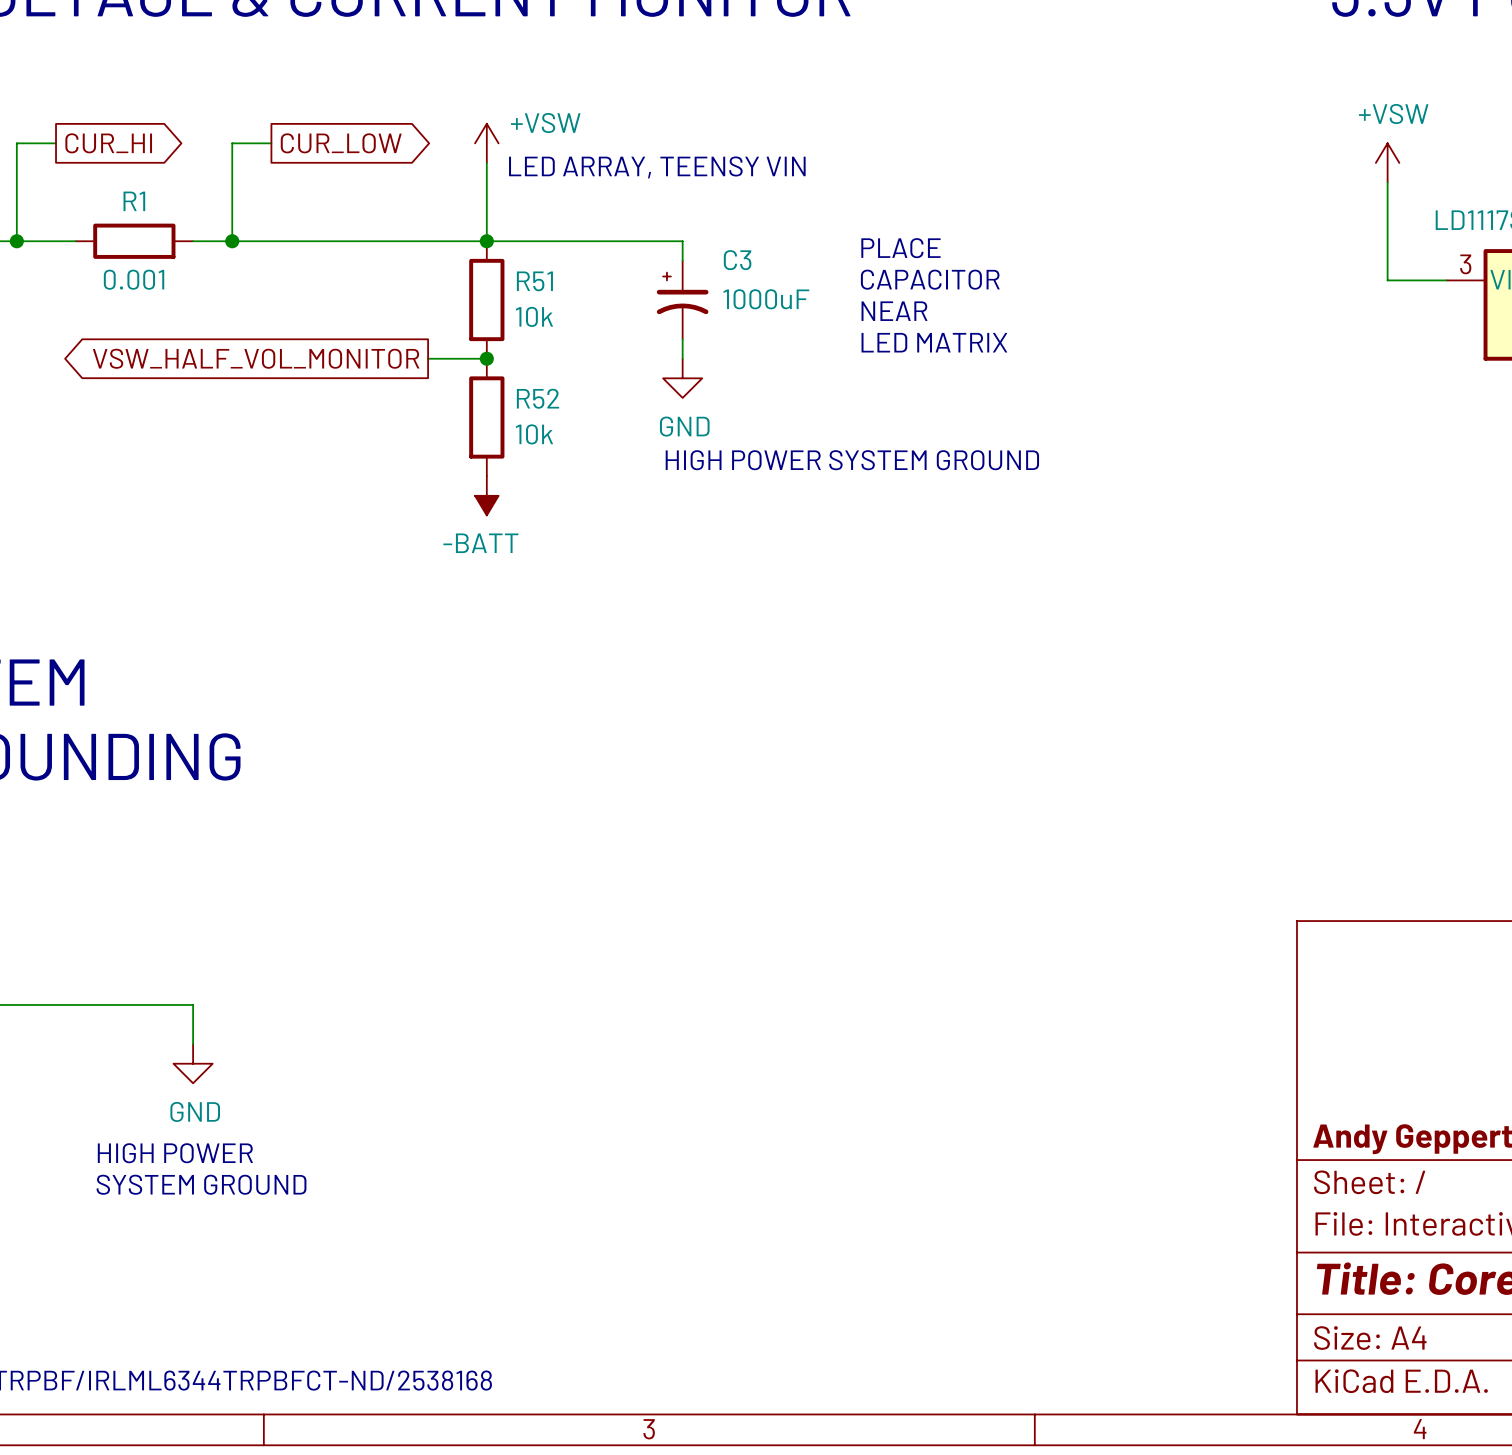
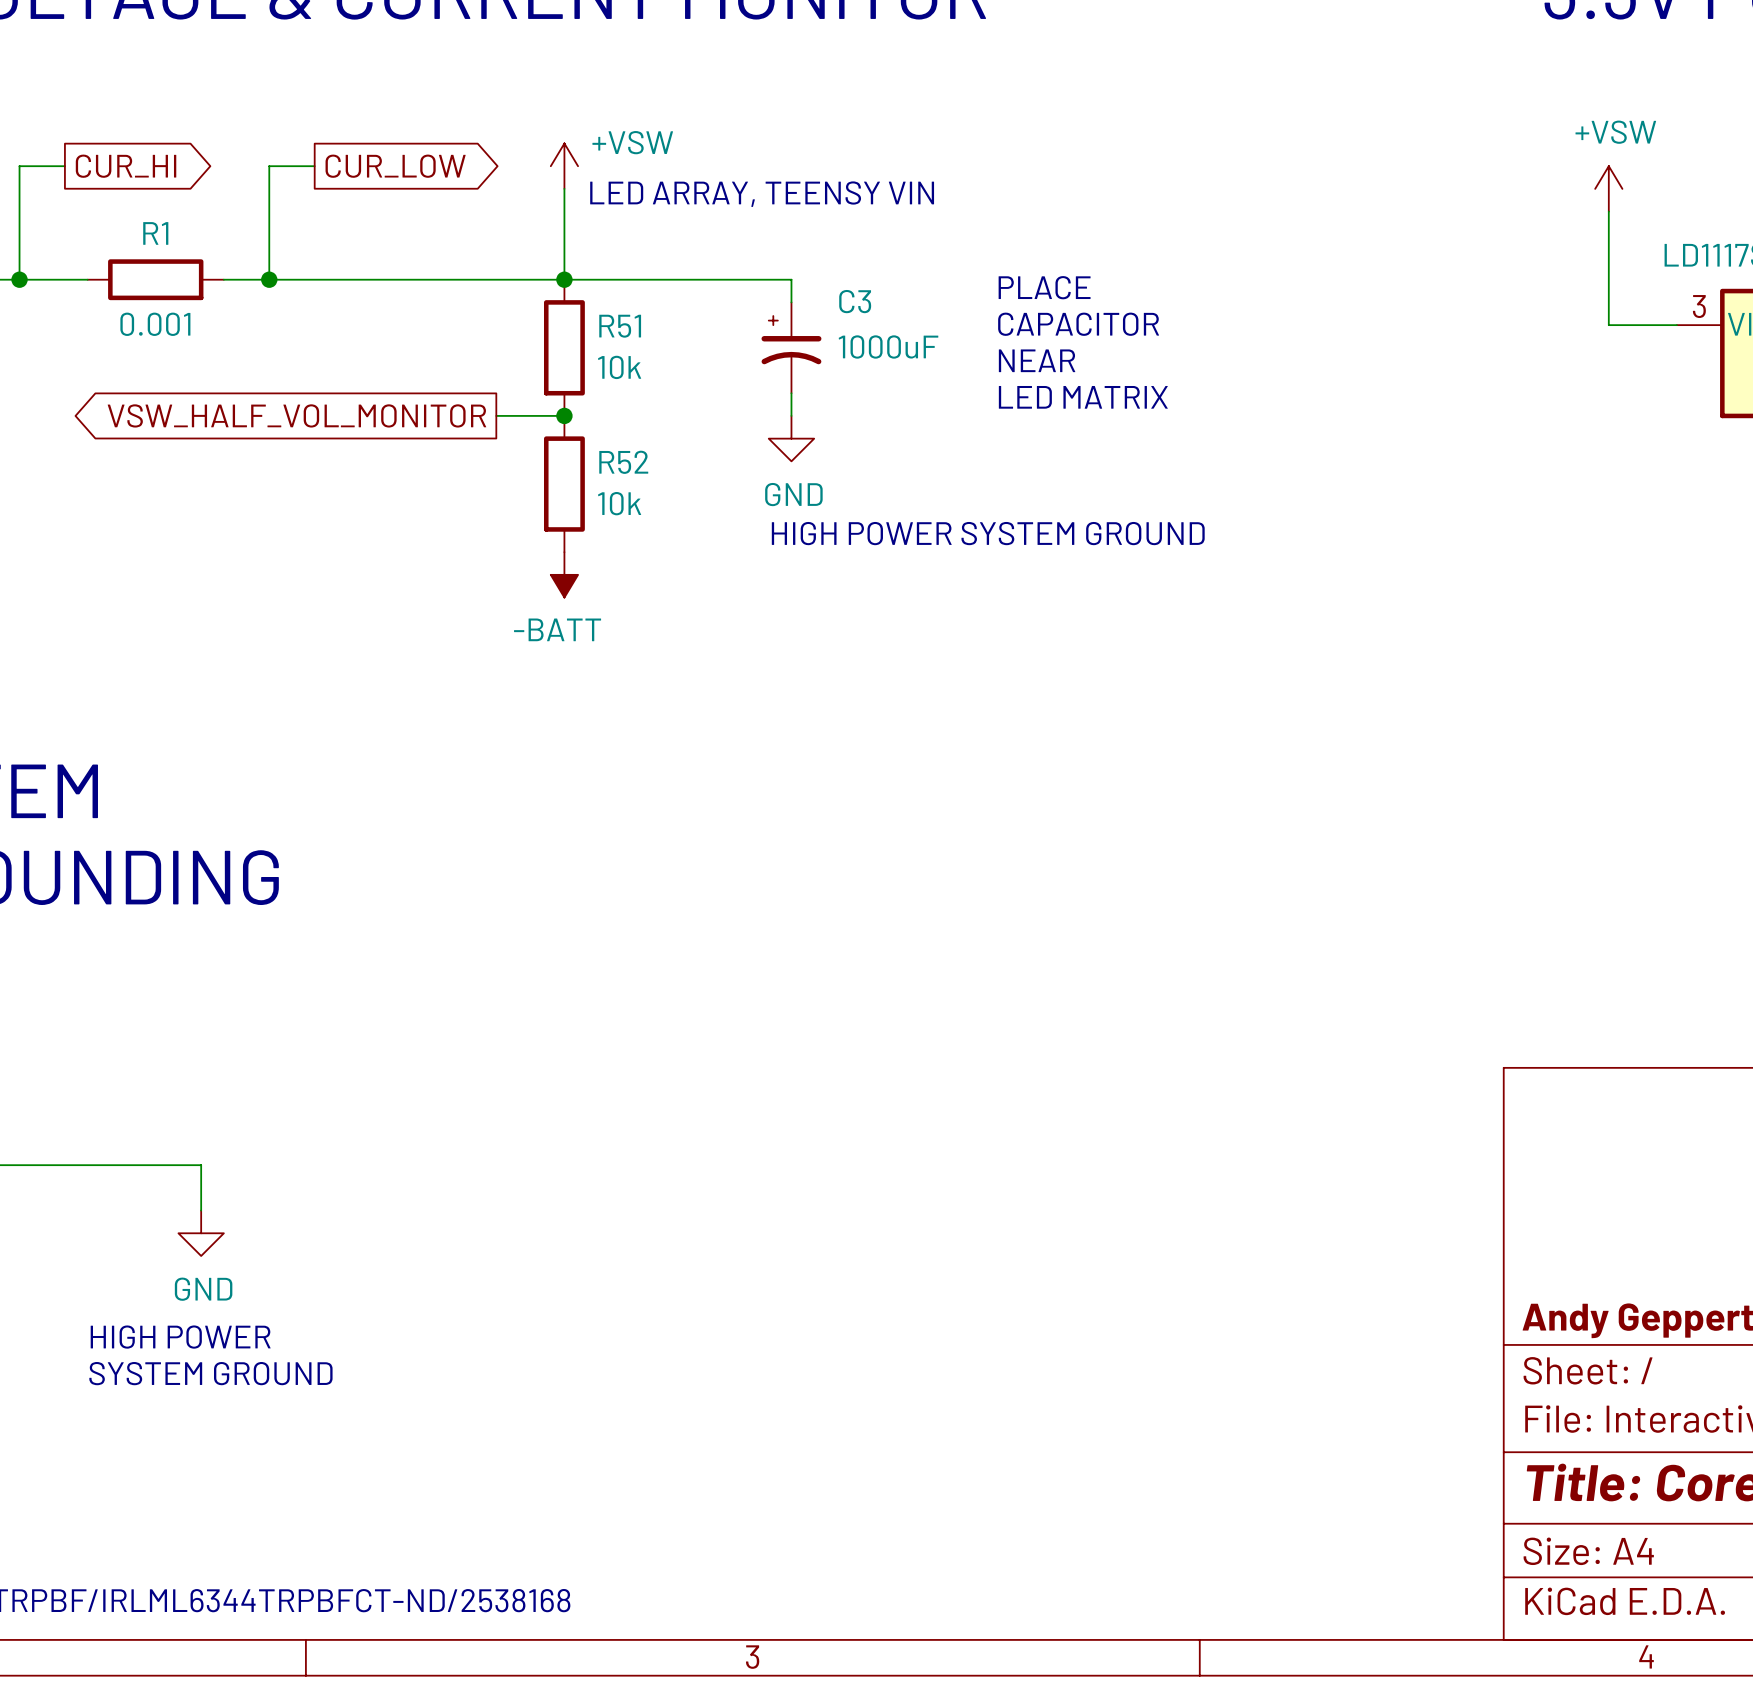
wire: (173, 1004) (193, 1004) (193, 1044) -> (201, 1165) (201, 1210)
power symbol position: GND (193, 1063) -> GND (201, 1233)
text position: HIGH POWER (175, 1153) -> HIGH POWER (180, 1337)
text position: SYSTEM GROUND (201, 1184) -> SYSTEM GROUND (210, 1373)

